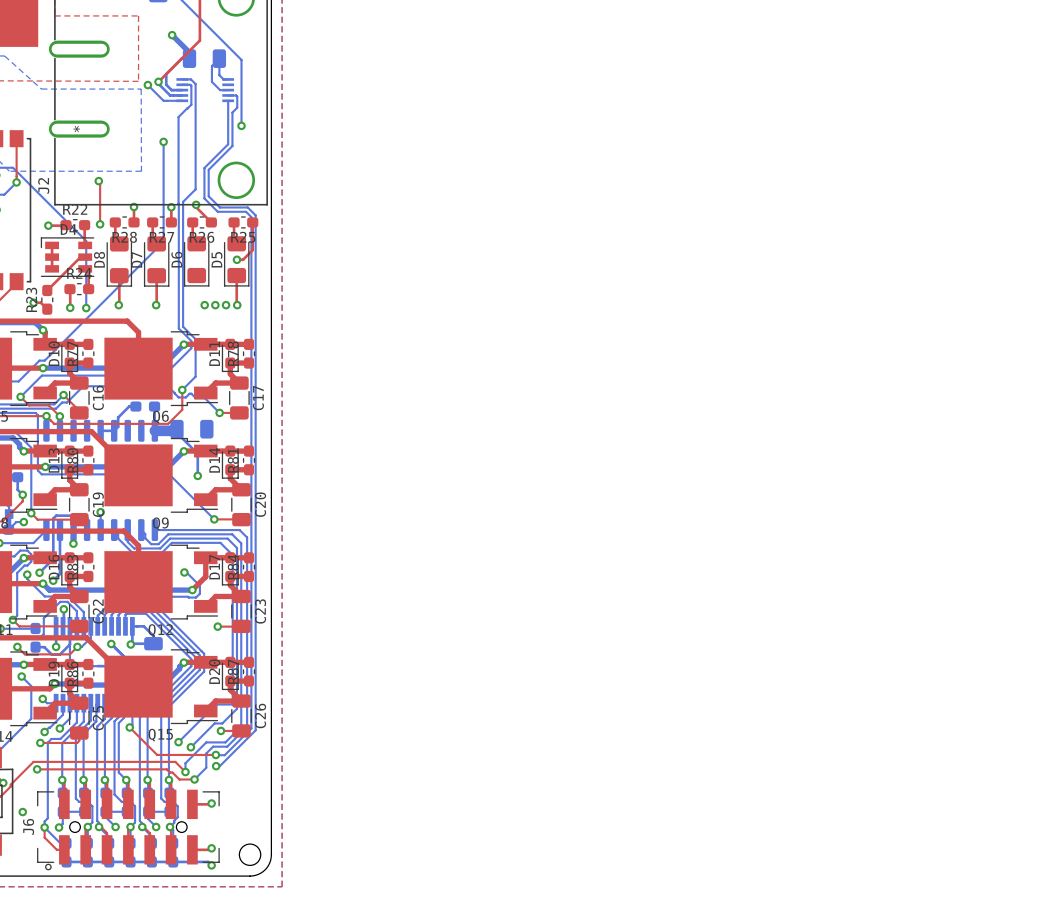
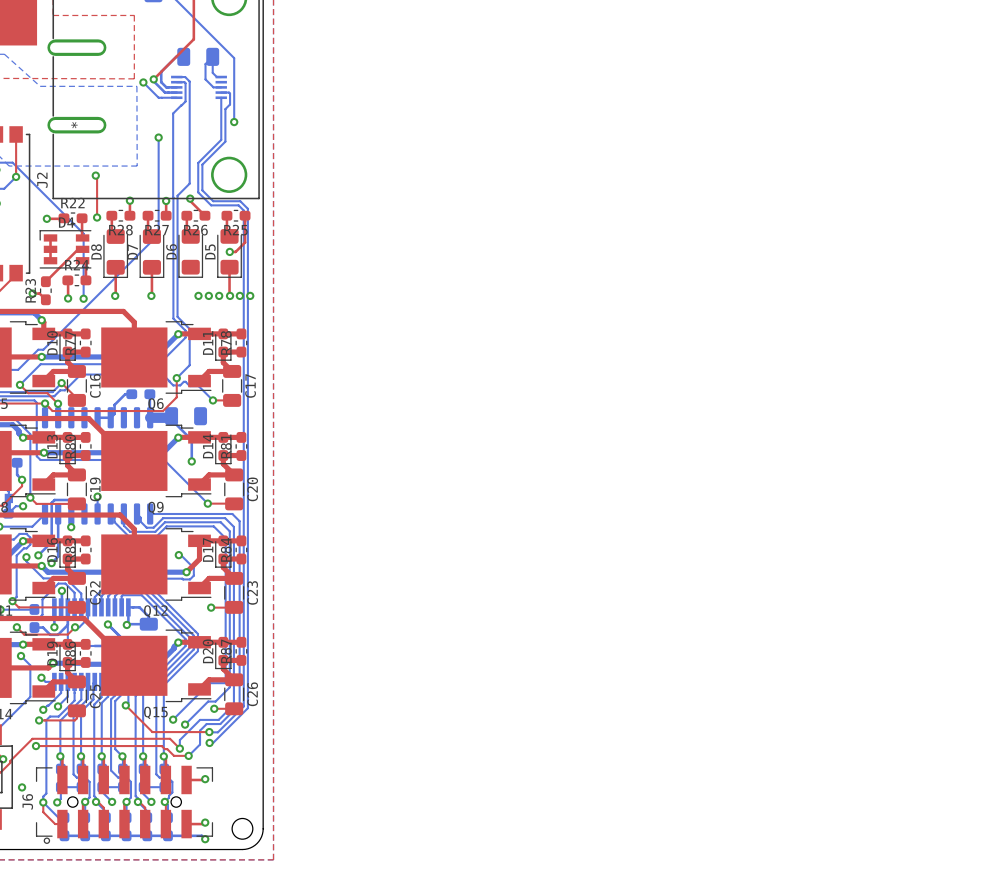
bottom track: (172, 35) (189, 52) (189, 58) -> none
via: (172, 35) -> none
via: none -> (239, 295)
via: none -> (250, 295)

